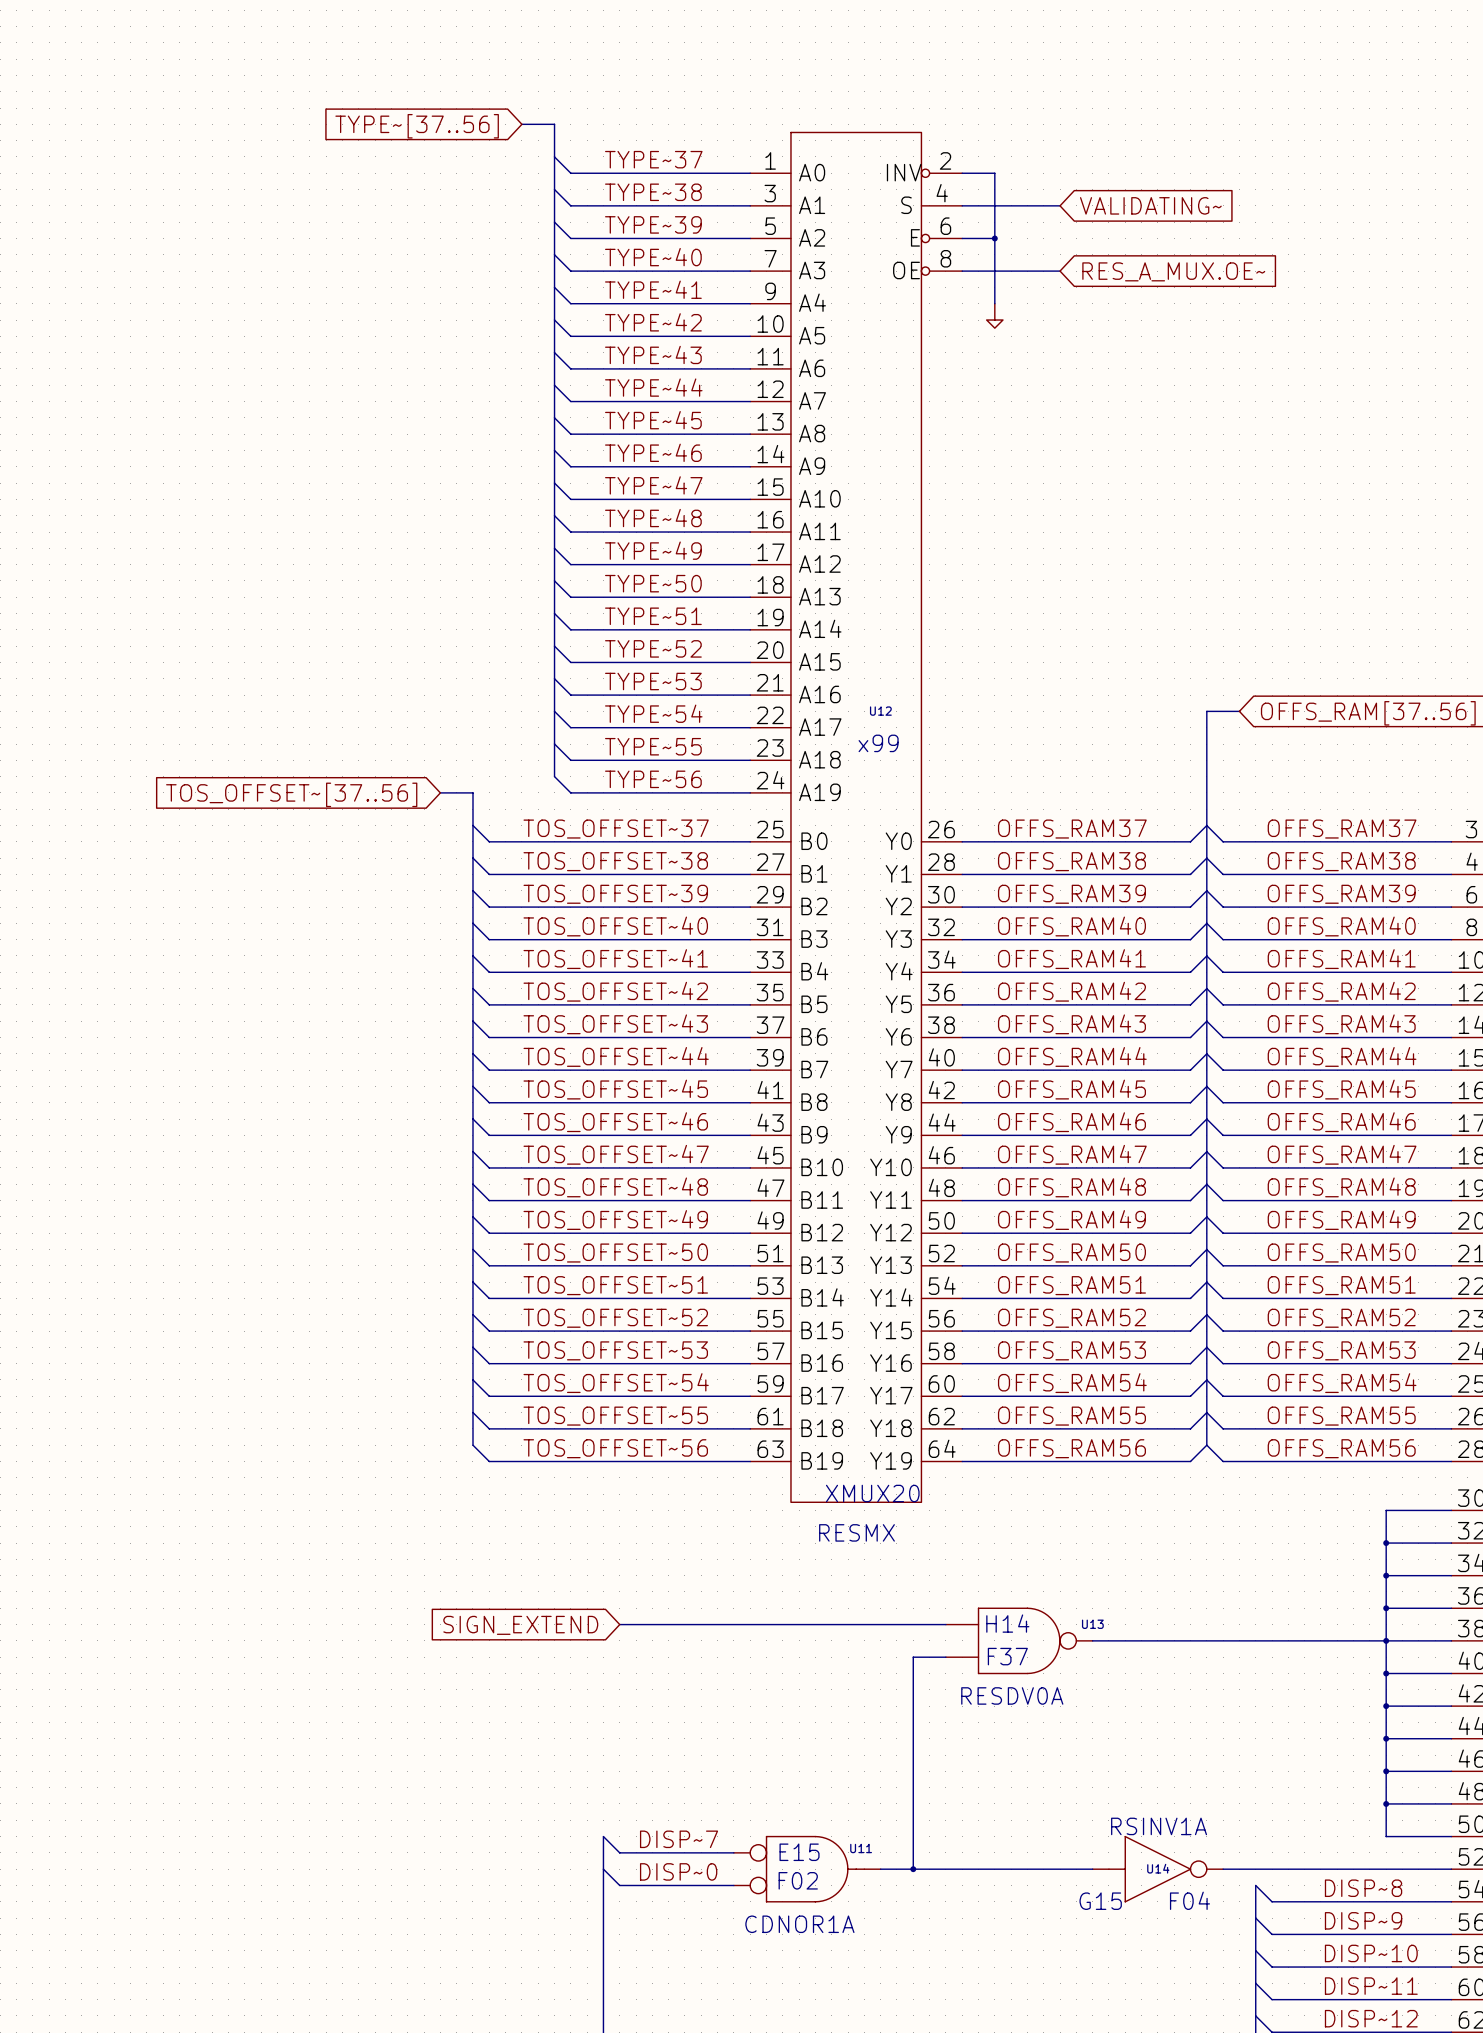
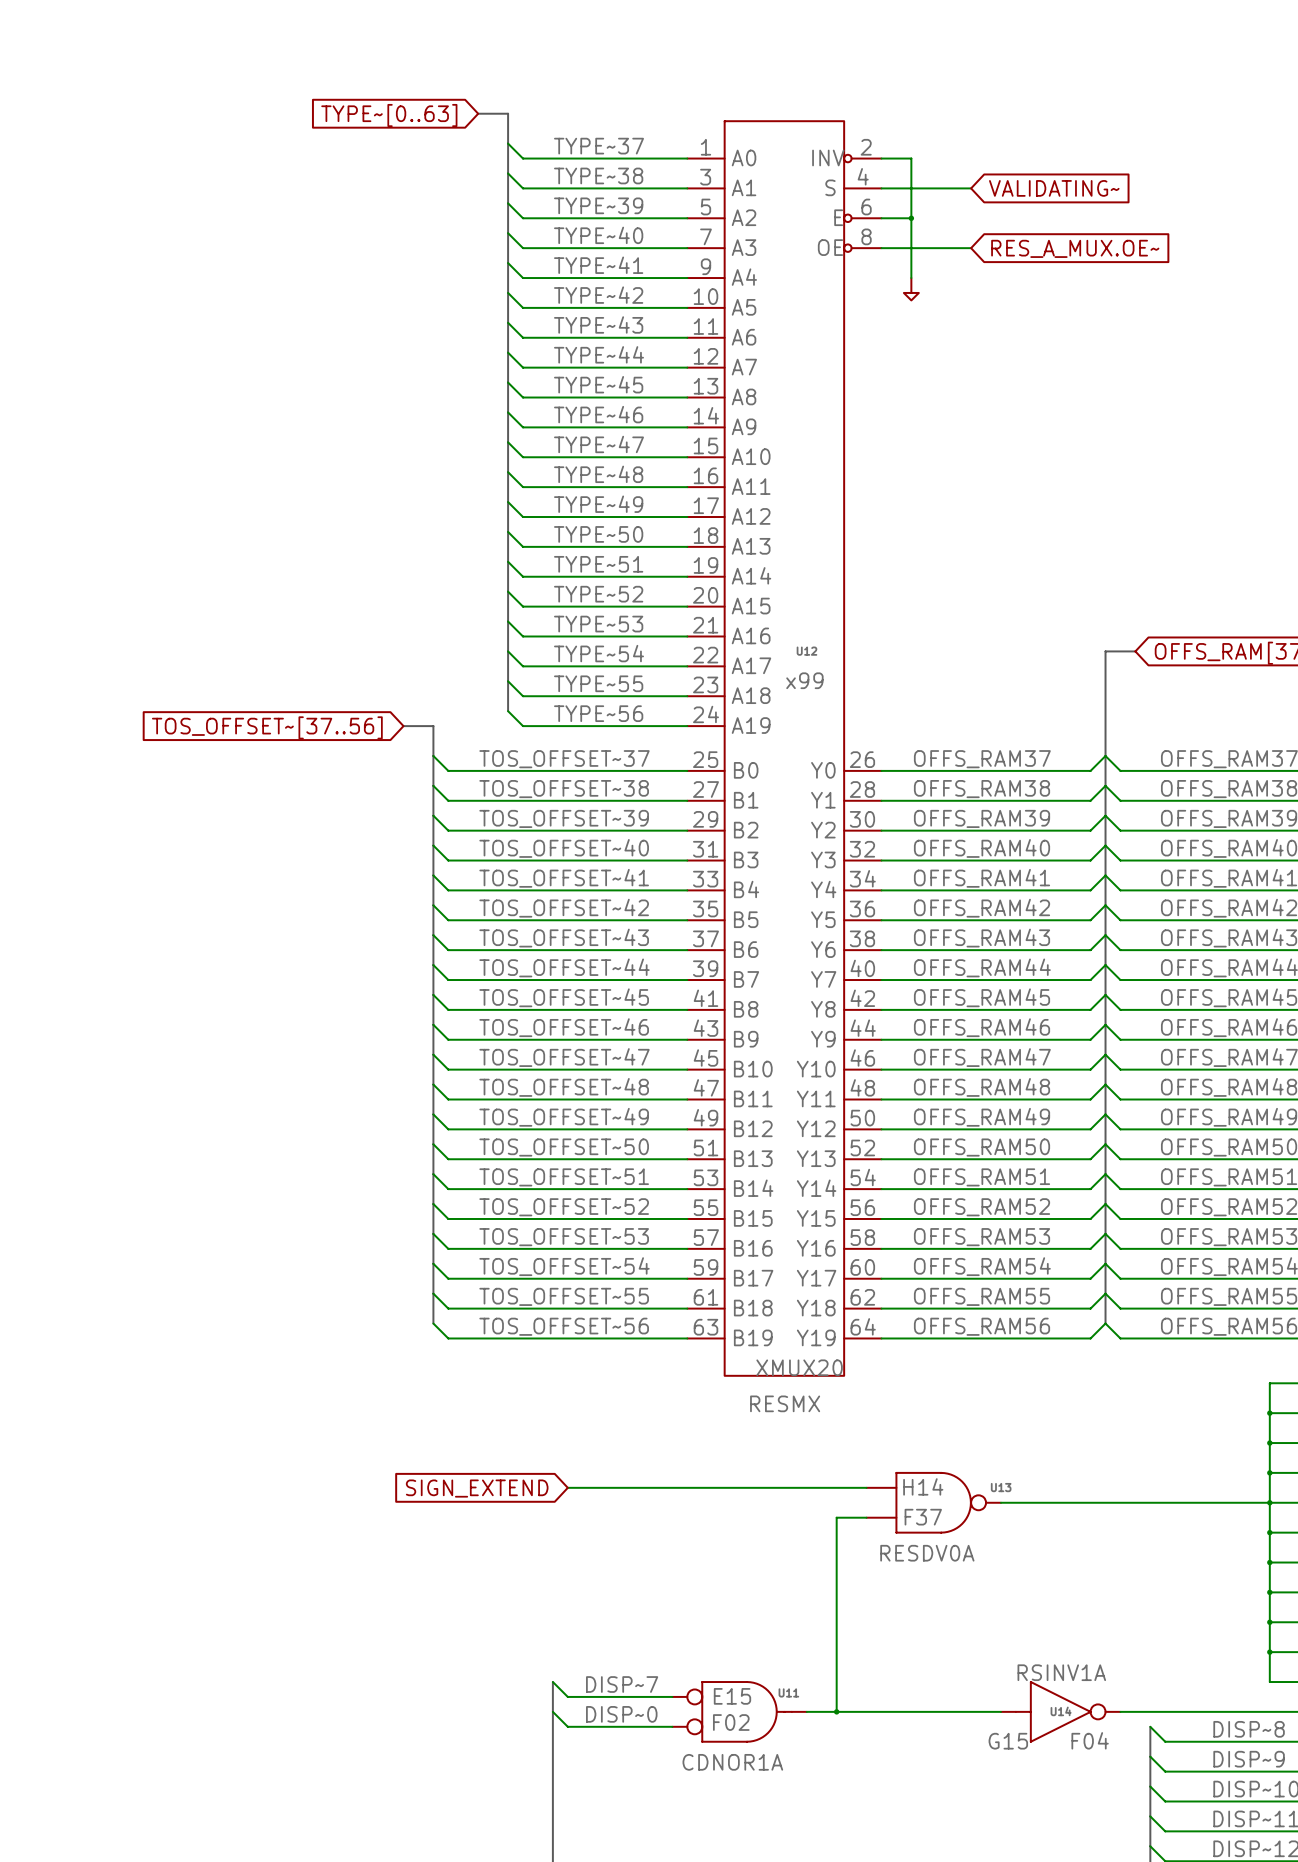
global label: TYPE~[37..56] (417, 126) -> TYPE~[0..63] (389, 115)

